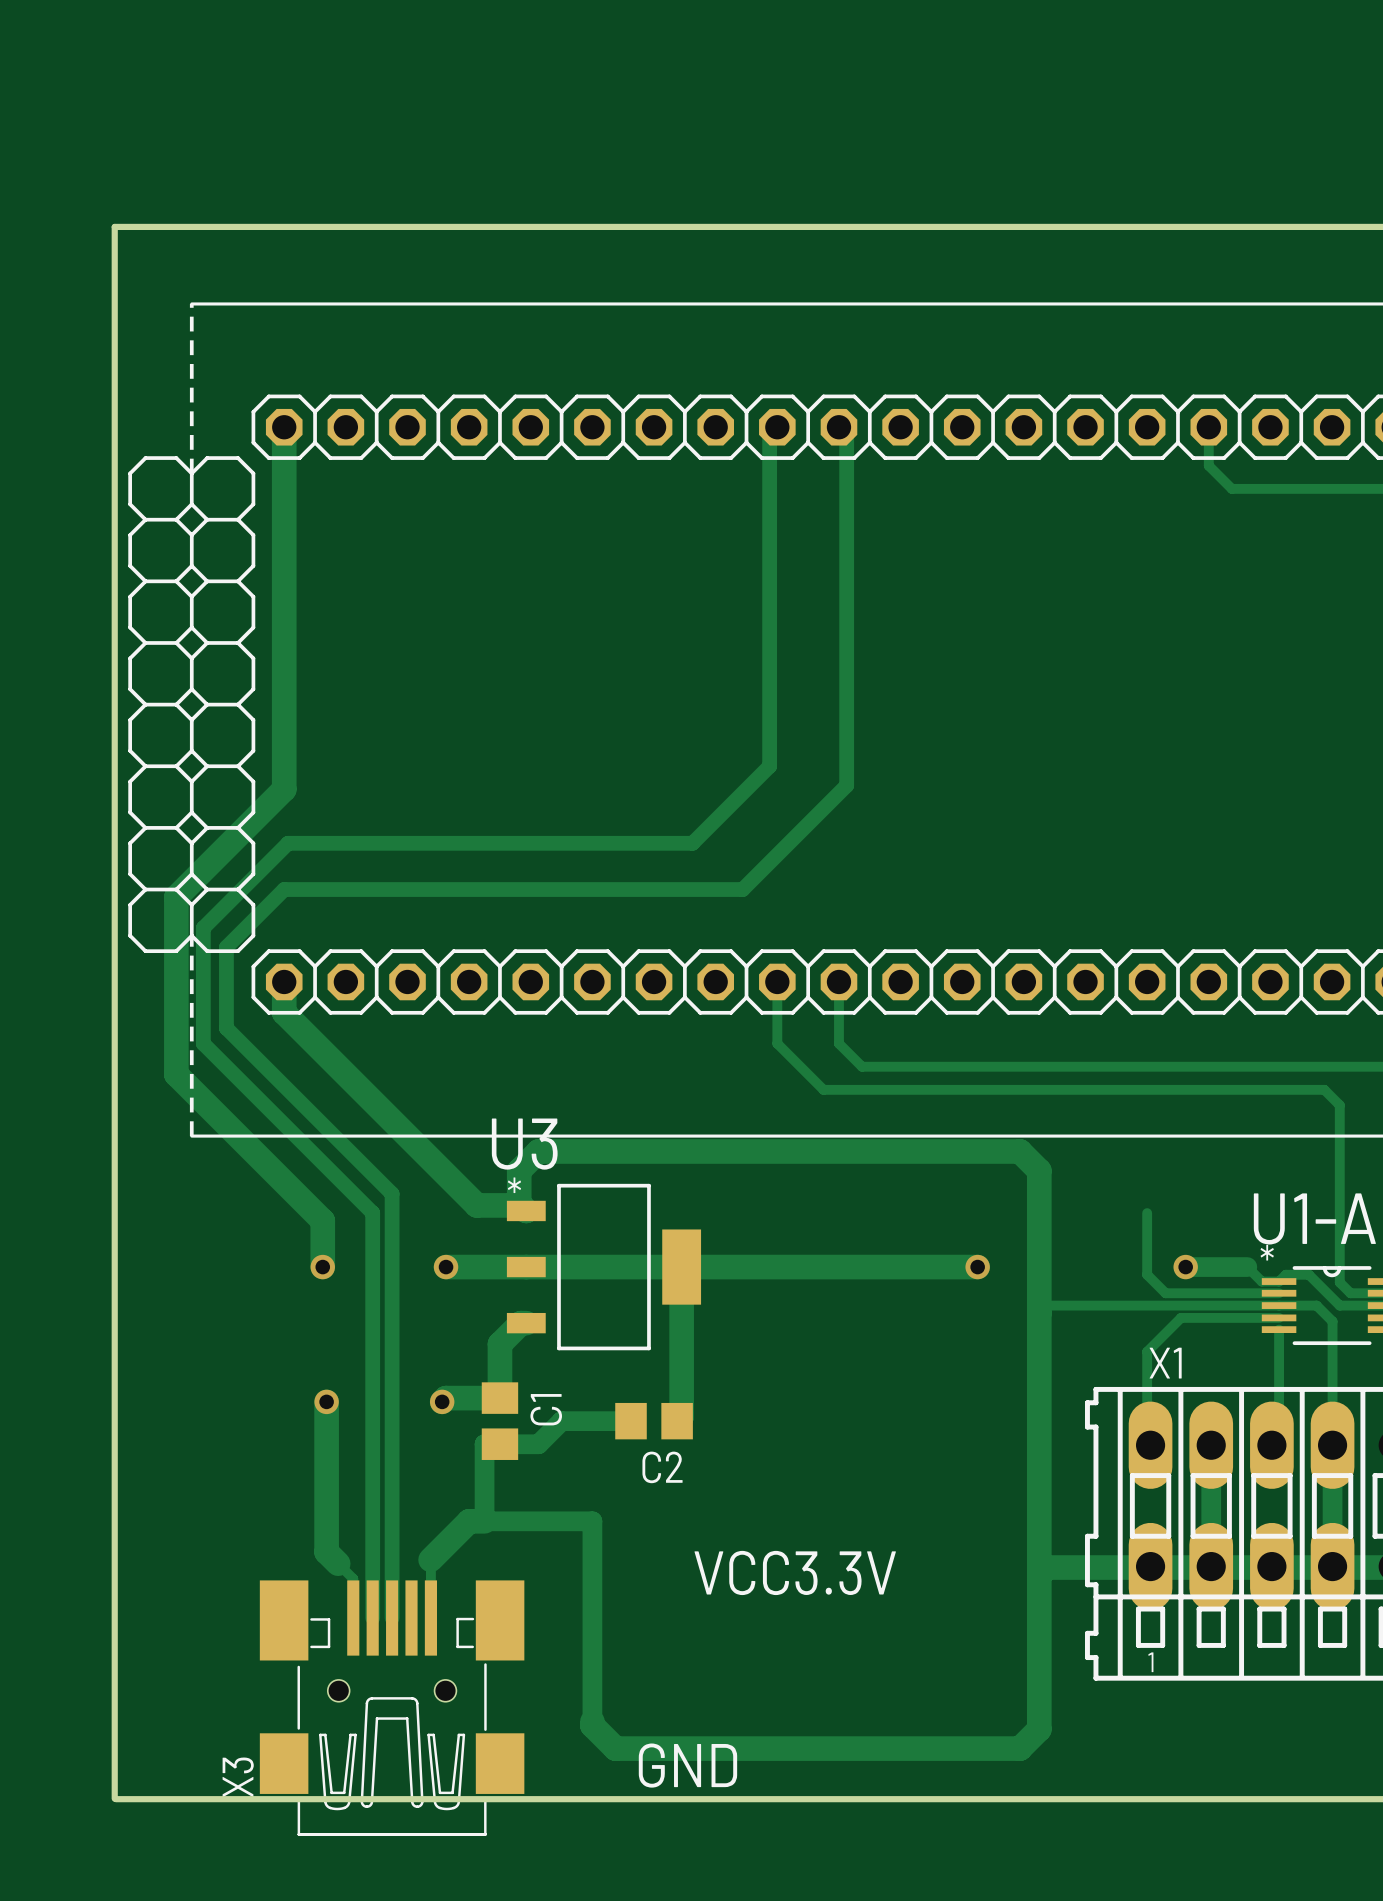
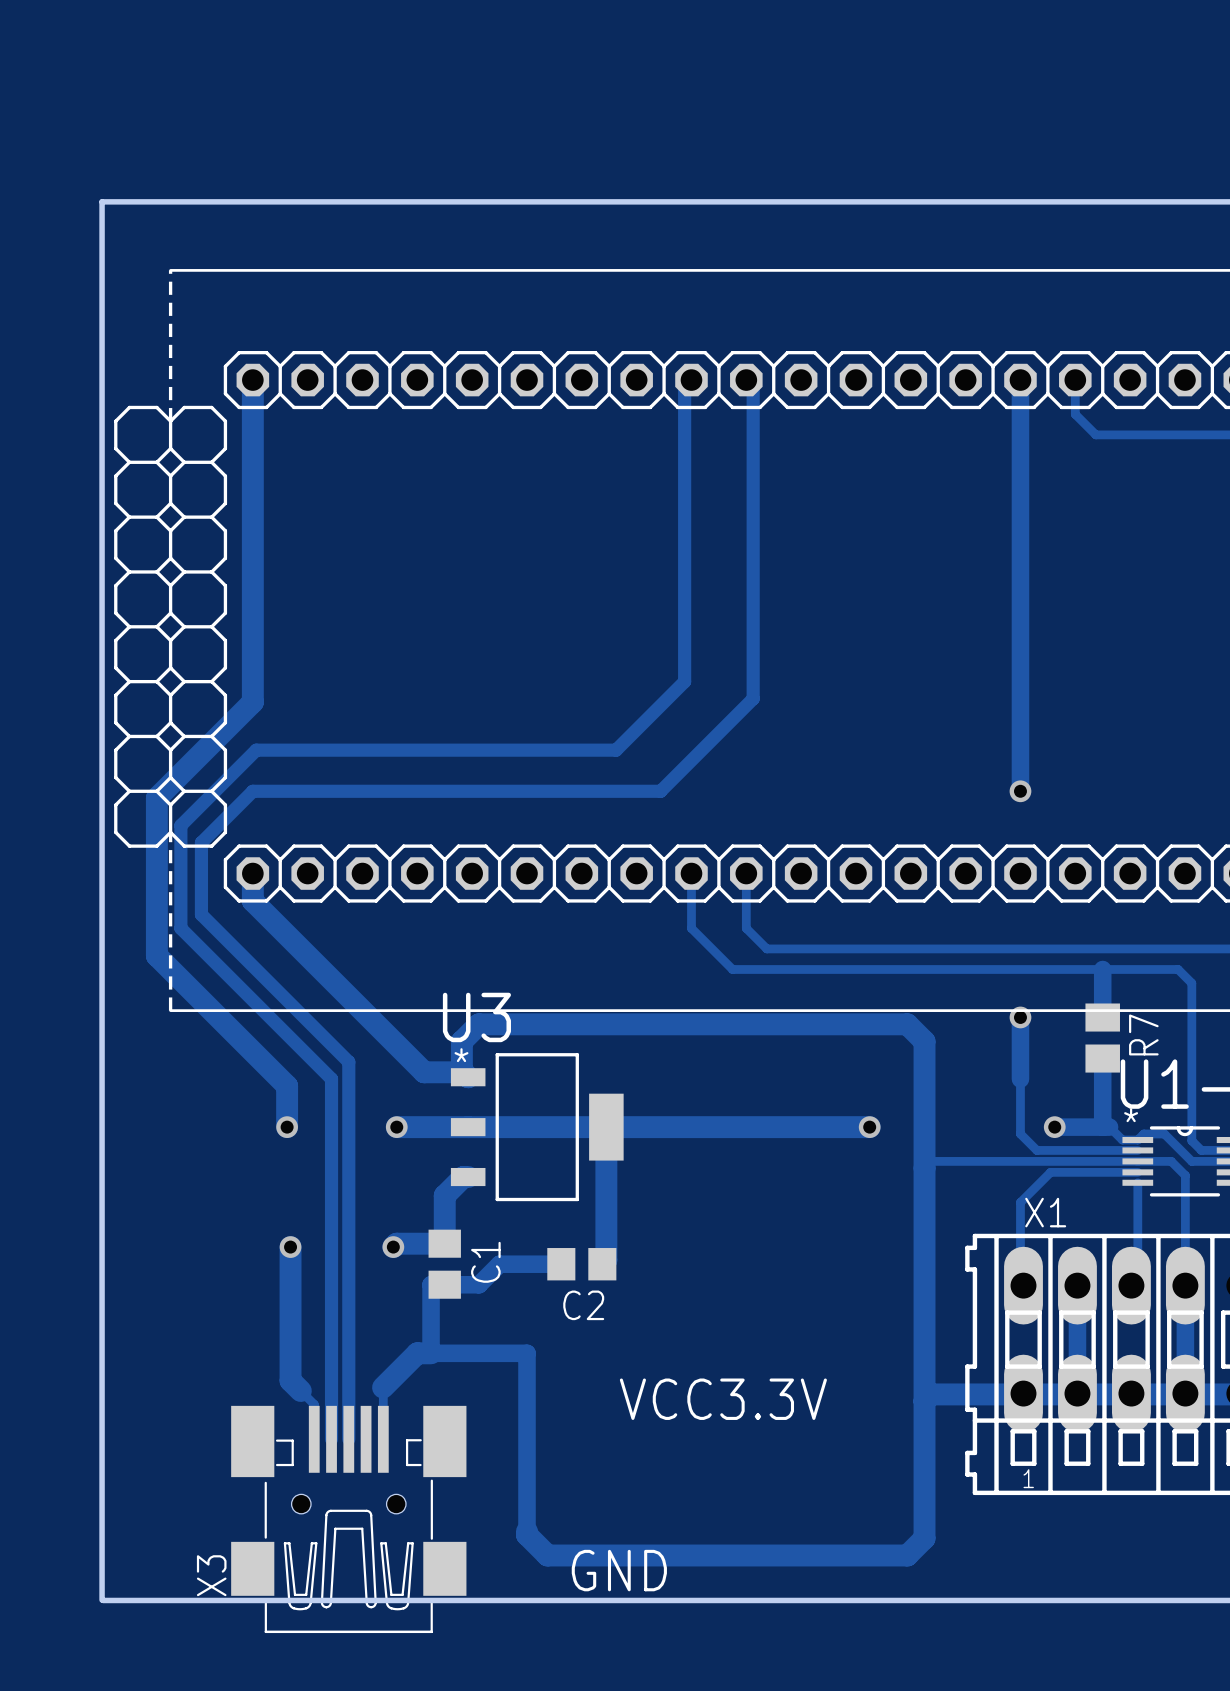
track: none -> (1020, 380) (1020, 791)
via: none -> (1020, 791)
track: none -> (1102, 969) (1102, 1017)
track: none -> (1020, 1017) (1020, 1079)
via: none -> (1020, 1017)
R7: none -> (1102, 1038)
track: none -> (1102, 1058) (1102, 1127)

